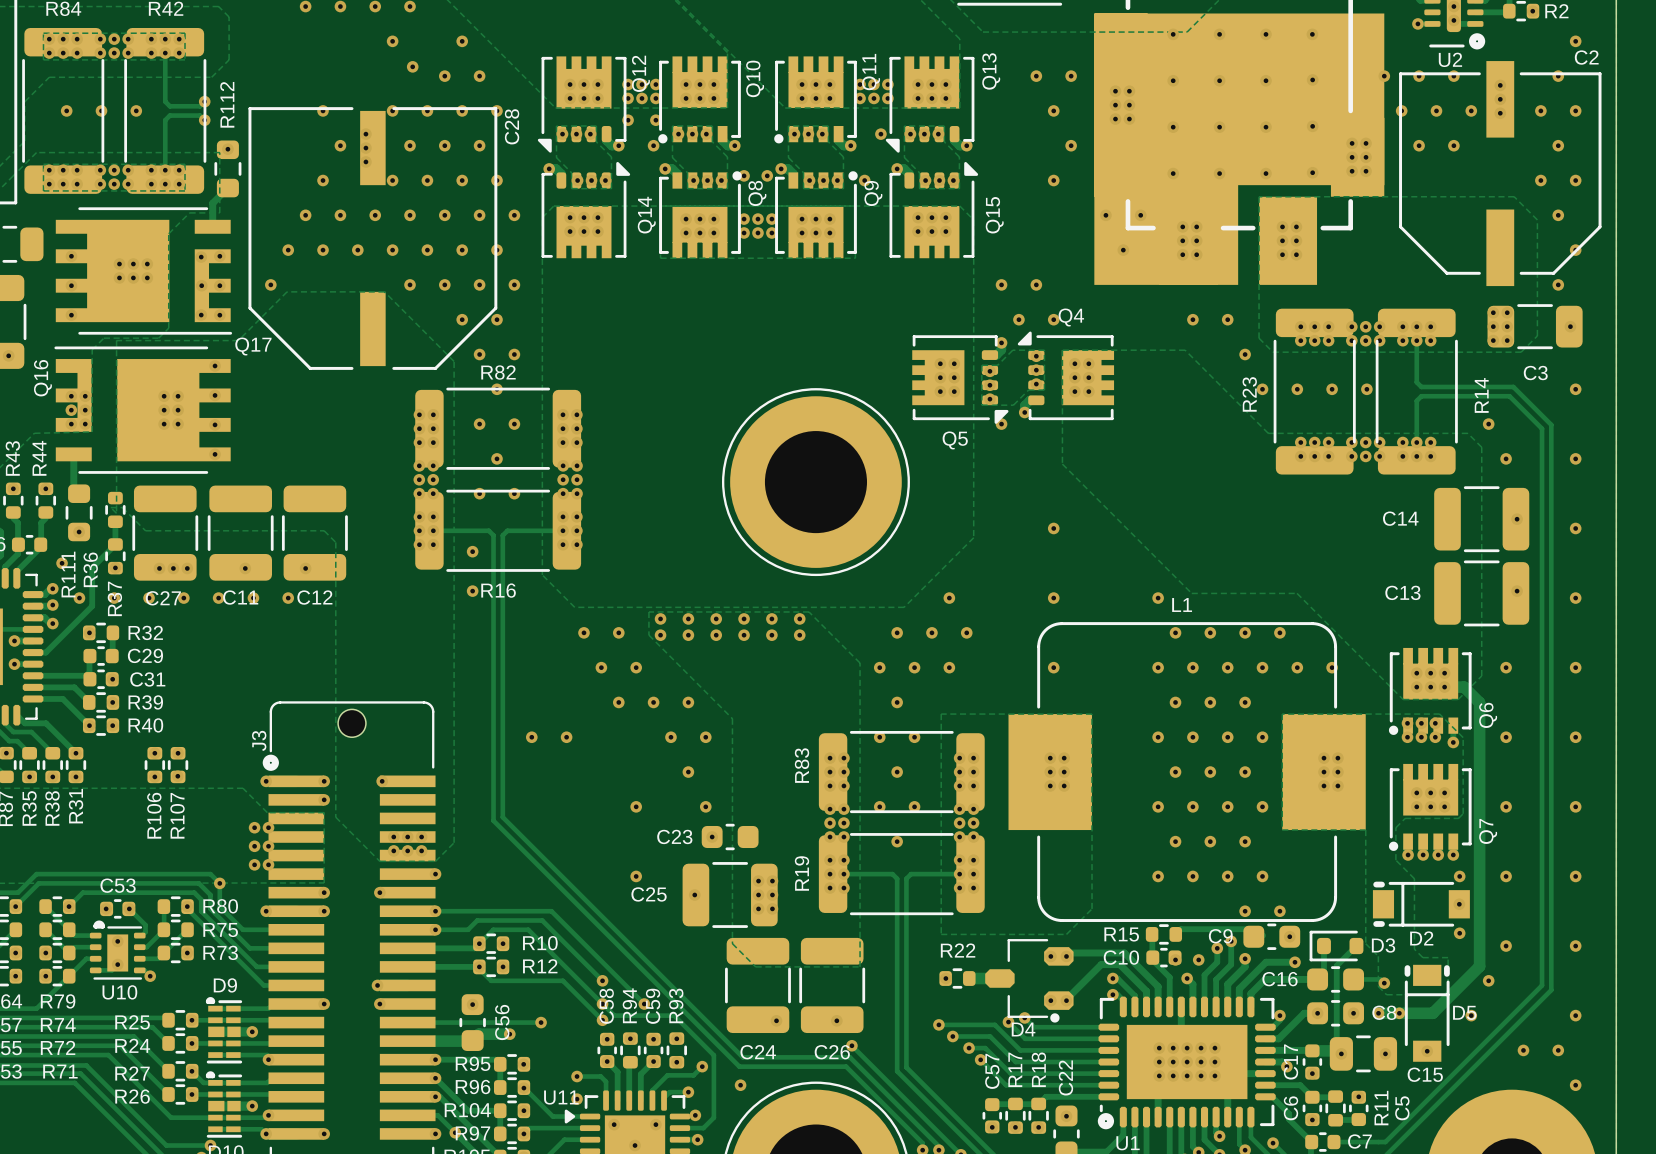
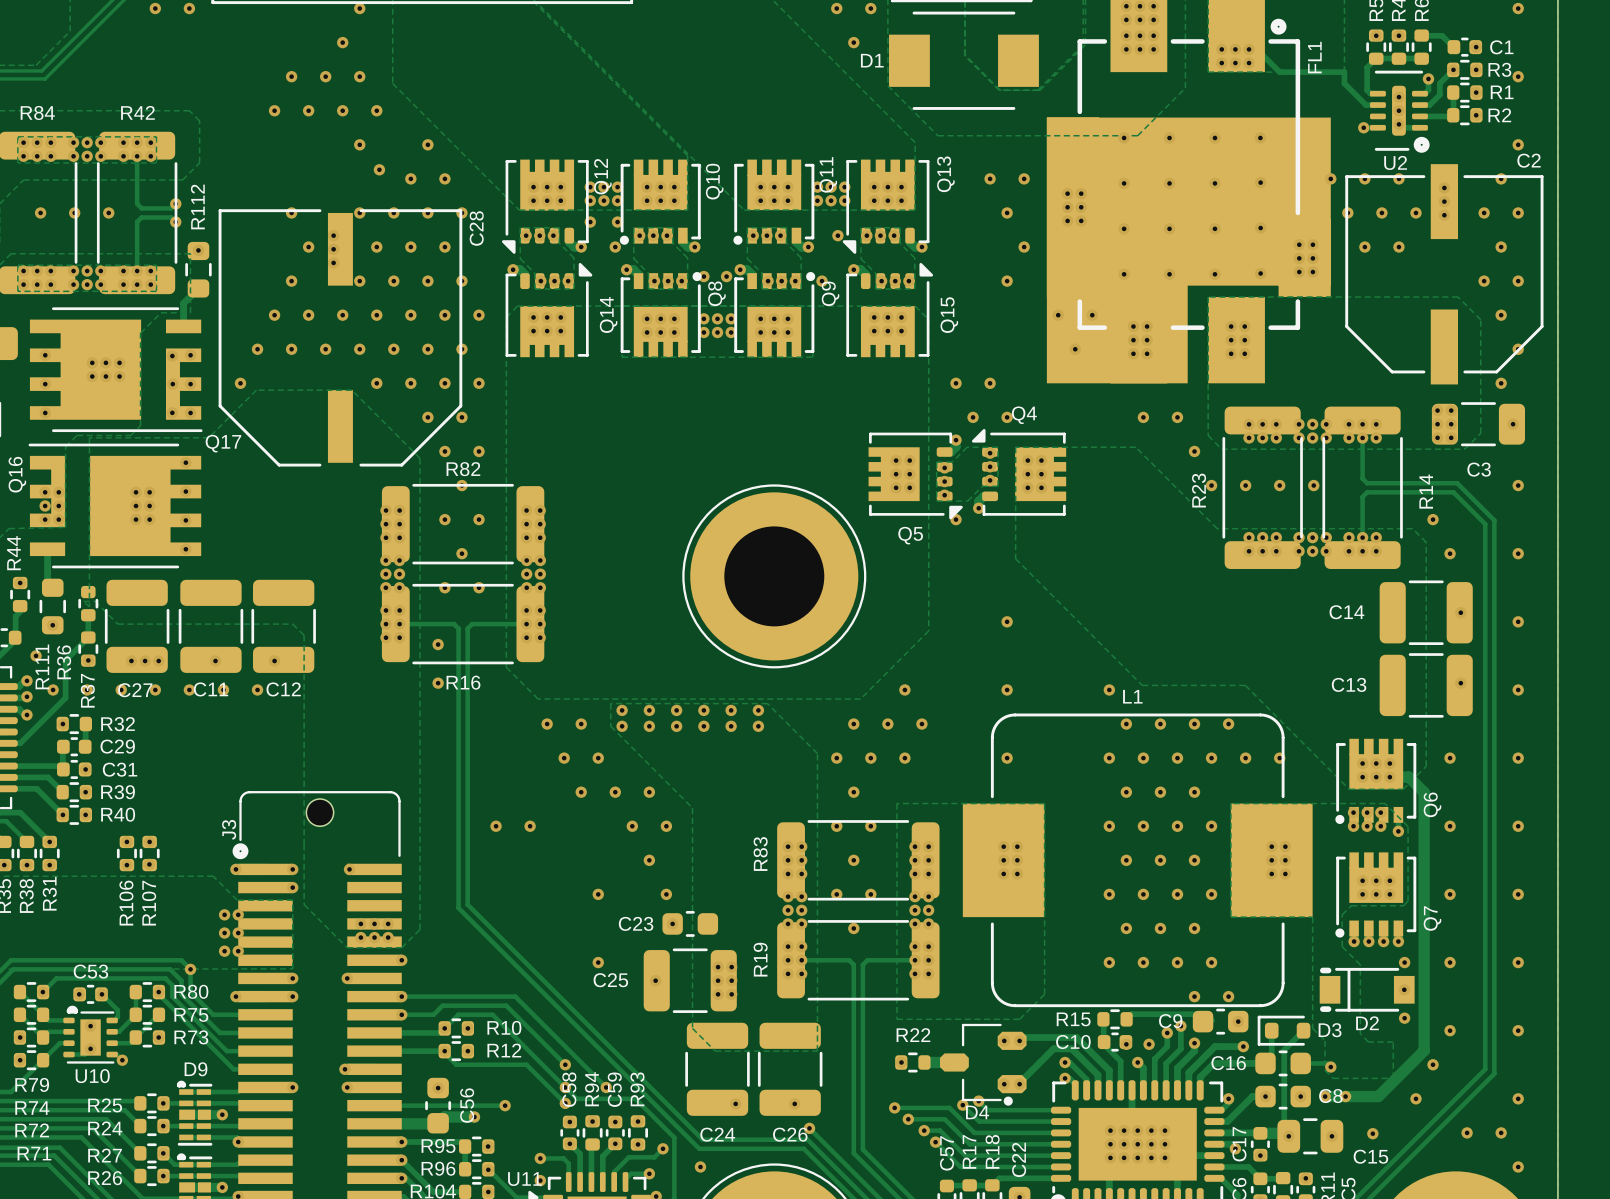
D5: (1427, 1013) -> none

